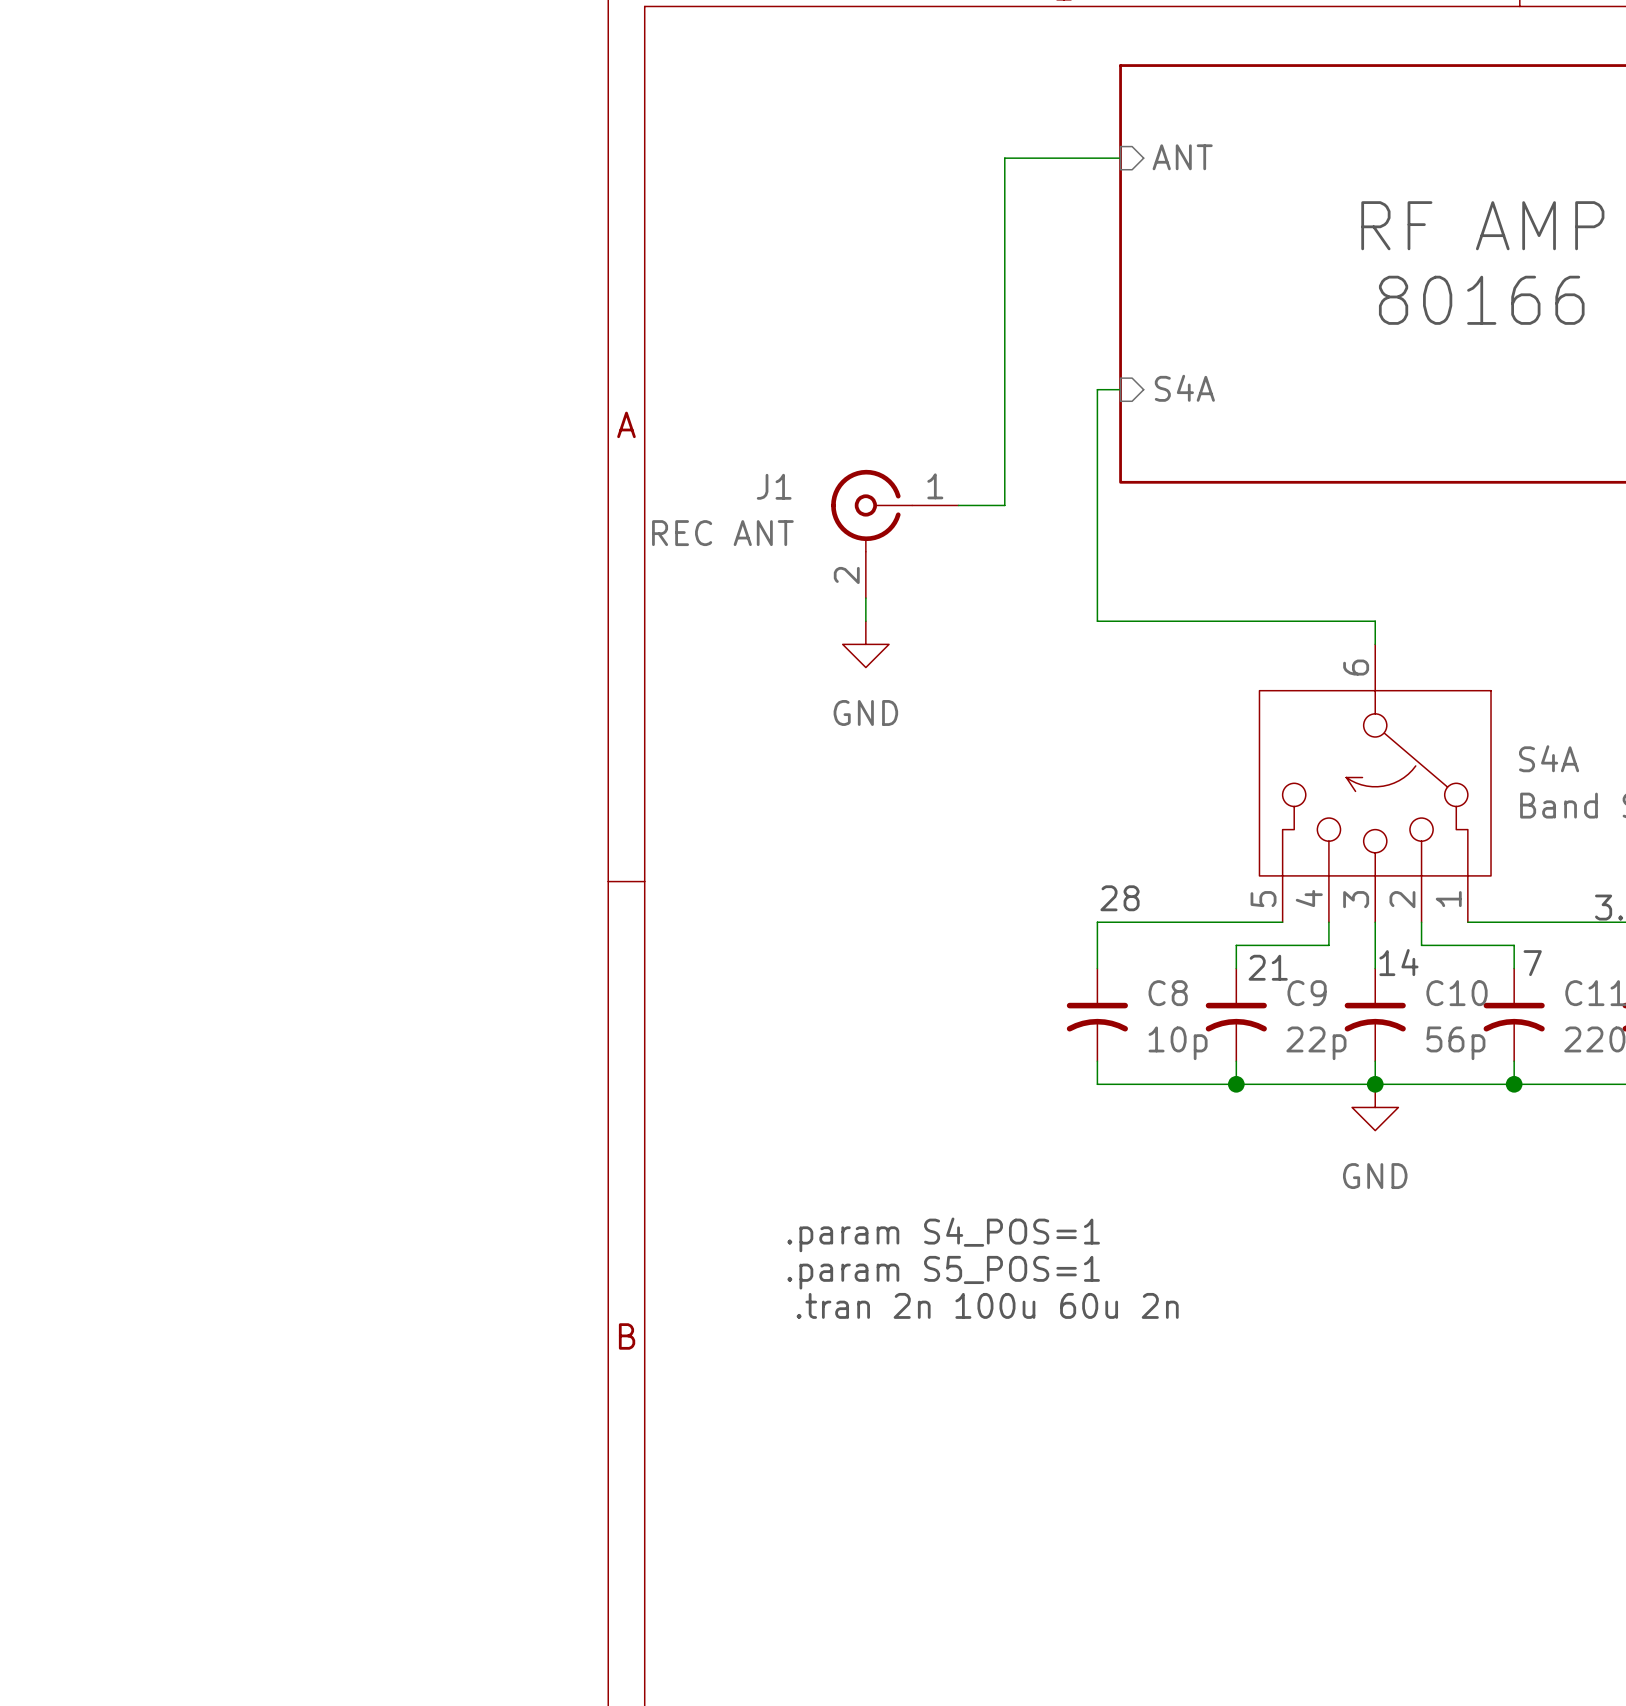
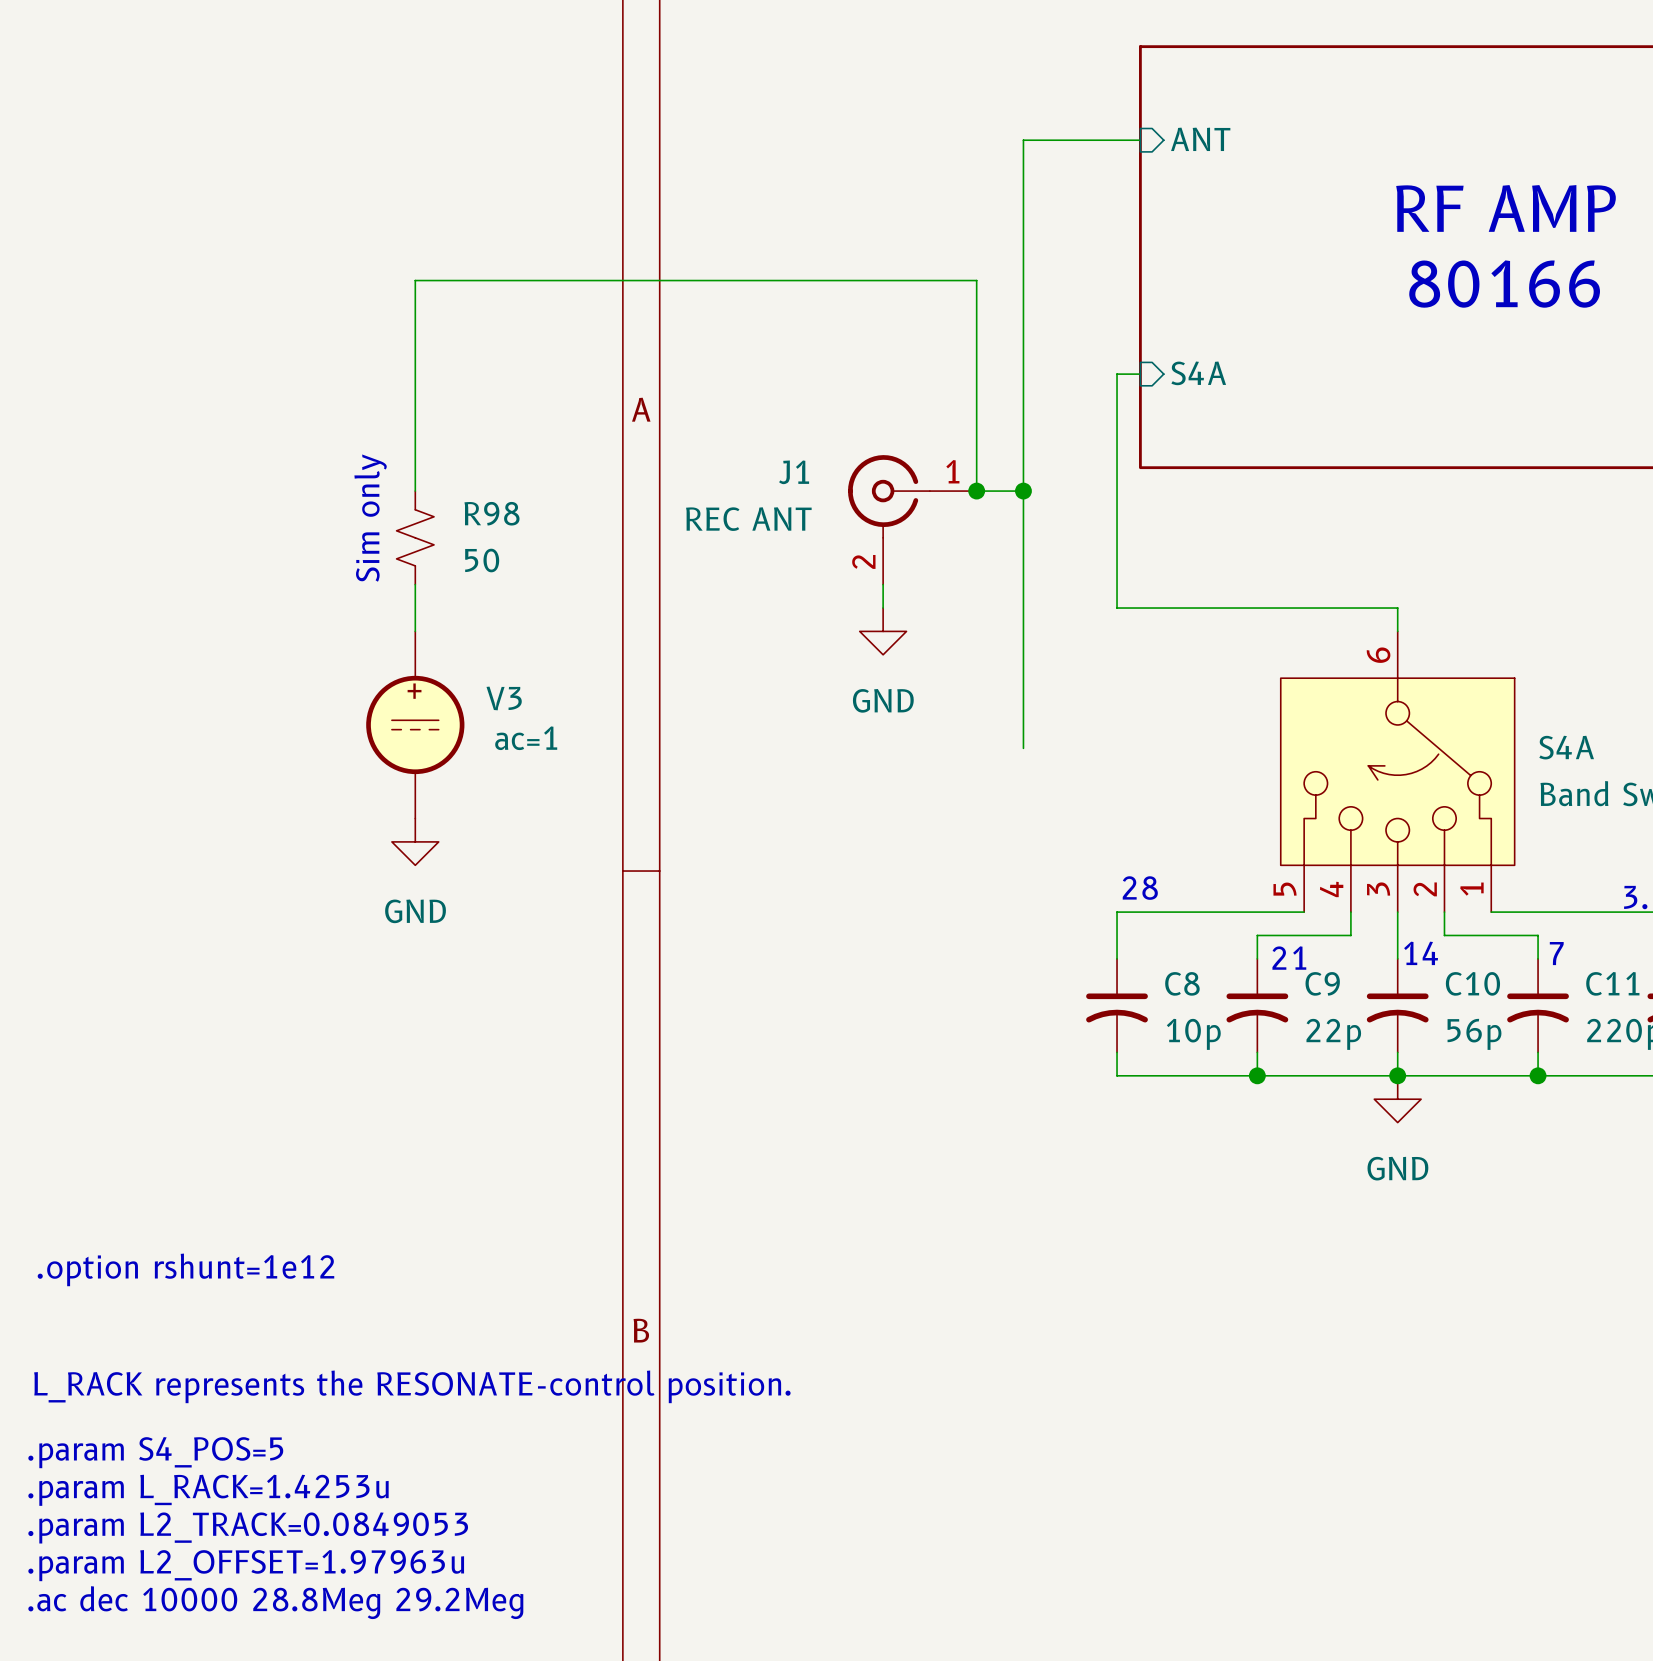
wire: none -> (415, 491) (415, 280) (976, 280) (976, 491)
junction: none -> (976, 491)
wire: none -> (1023, 491) (1023, 748)
junction: none -> (1023, 491)
text: none -> Sim only (370, 518)
R98: none -> 50 (415, 537)
wire: none -> (415, 584) (415, 631)
V3: none -> (415, 724)
power symbol: none -> GND (415, 841)
text: .param S4_POS=1 (943, 1234) -> none
text: .param S5_POS=1 (943, 1272) -> none
text: none -> .option rshunt=1e12 (185, 1269)
text: .tran 2n 100u 60u 2n (987, 1305) -> none
text: none -> L_RACK represents the RESONATE-control position. (412, 1386)
text: none -> .param S4_POS=5 (155, 1452)
text: none -> .param L_RACK=1.4253u (208, 1490)
text: none -> .param L2_TRACK=0.0849053 (248, 1527)
text: none -> .param L2_OFFSET=1.97963u (246, 1565)
text: none -> .ac dec 10000 28.8Meg 29.2Meg (275, 1602)

